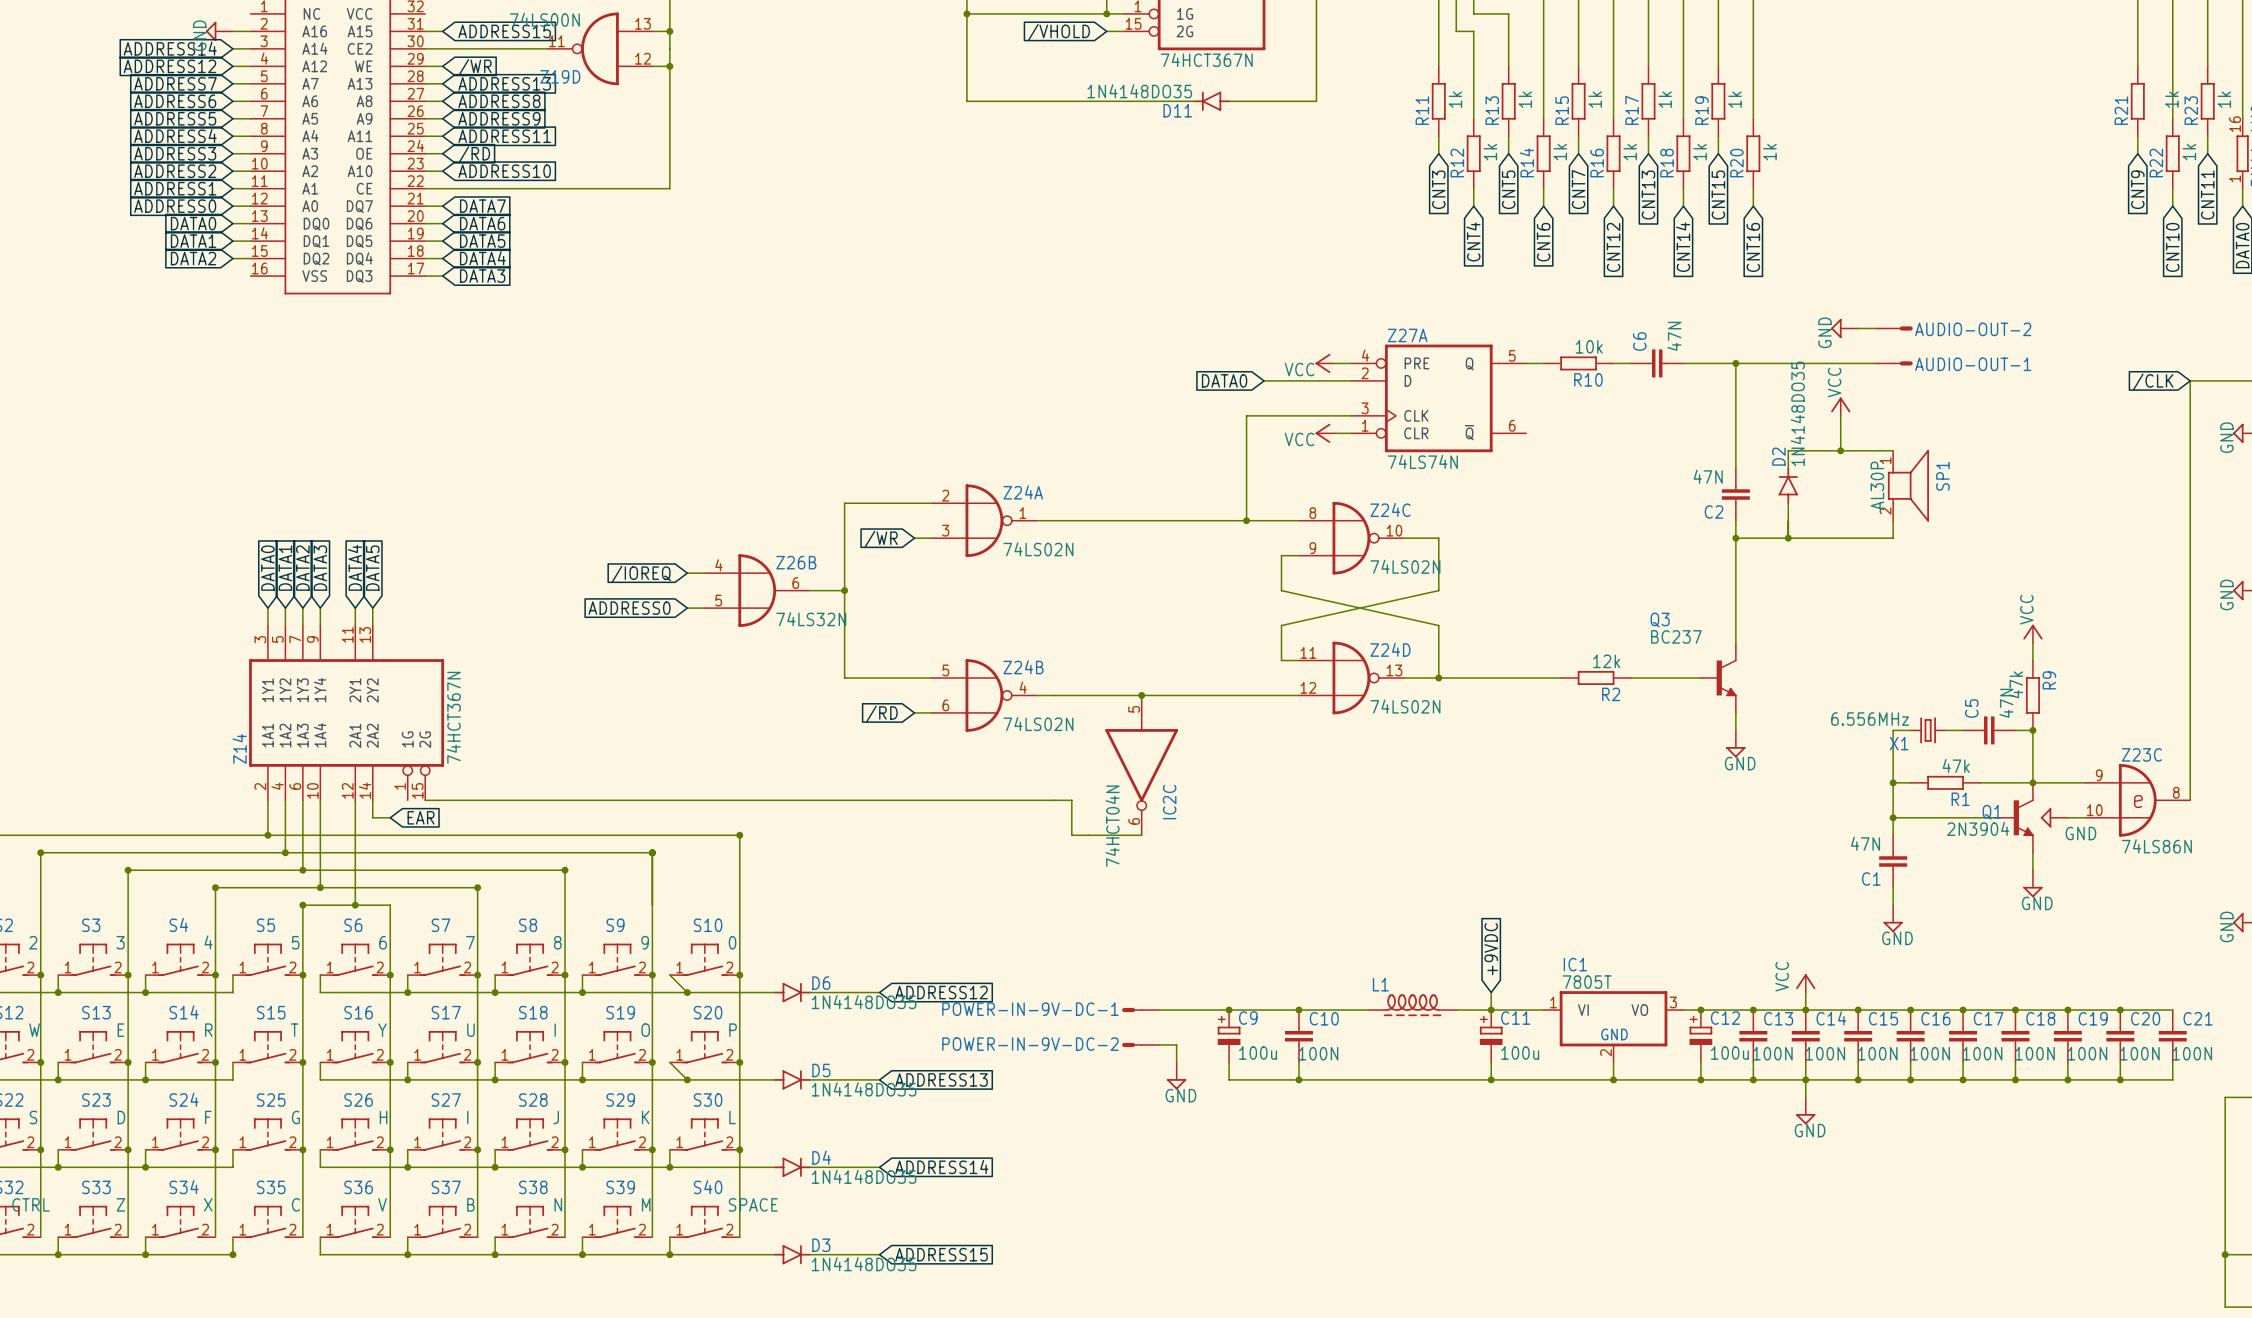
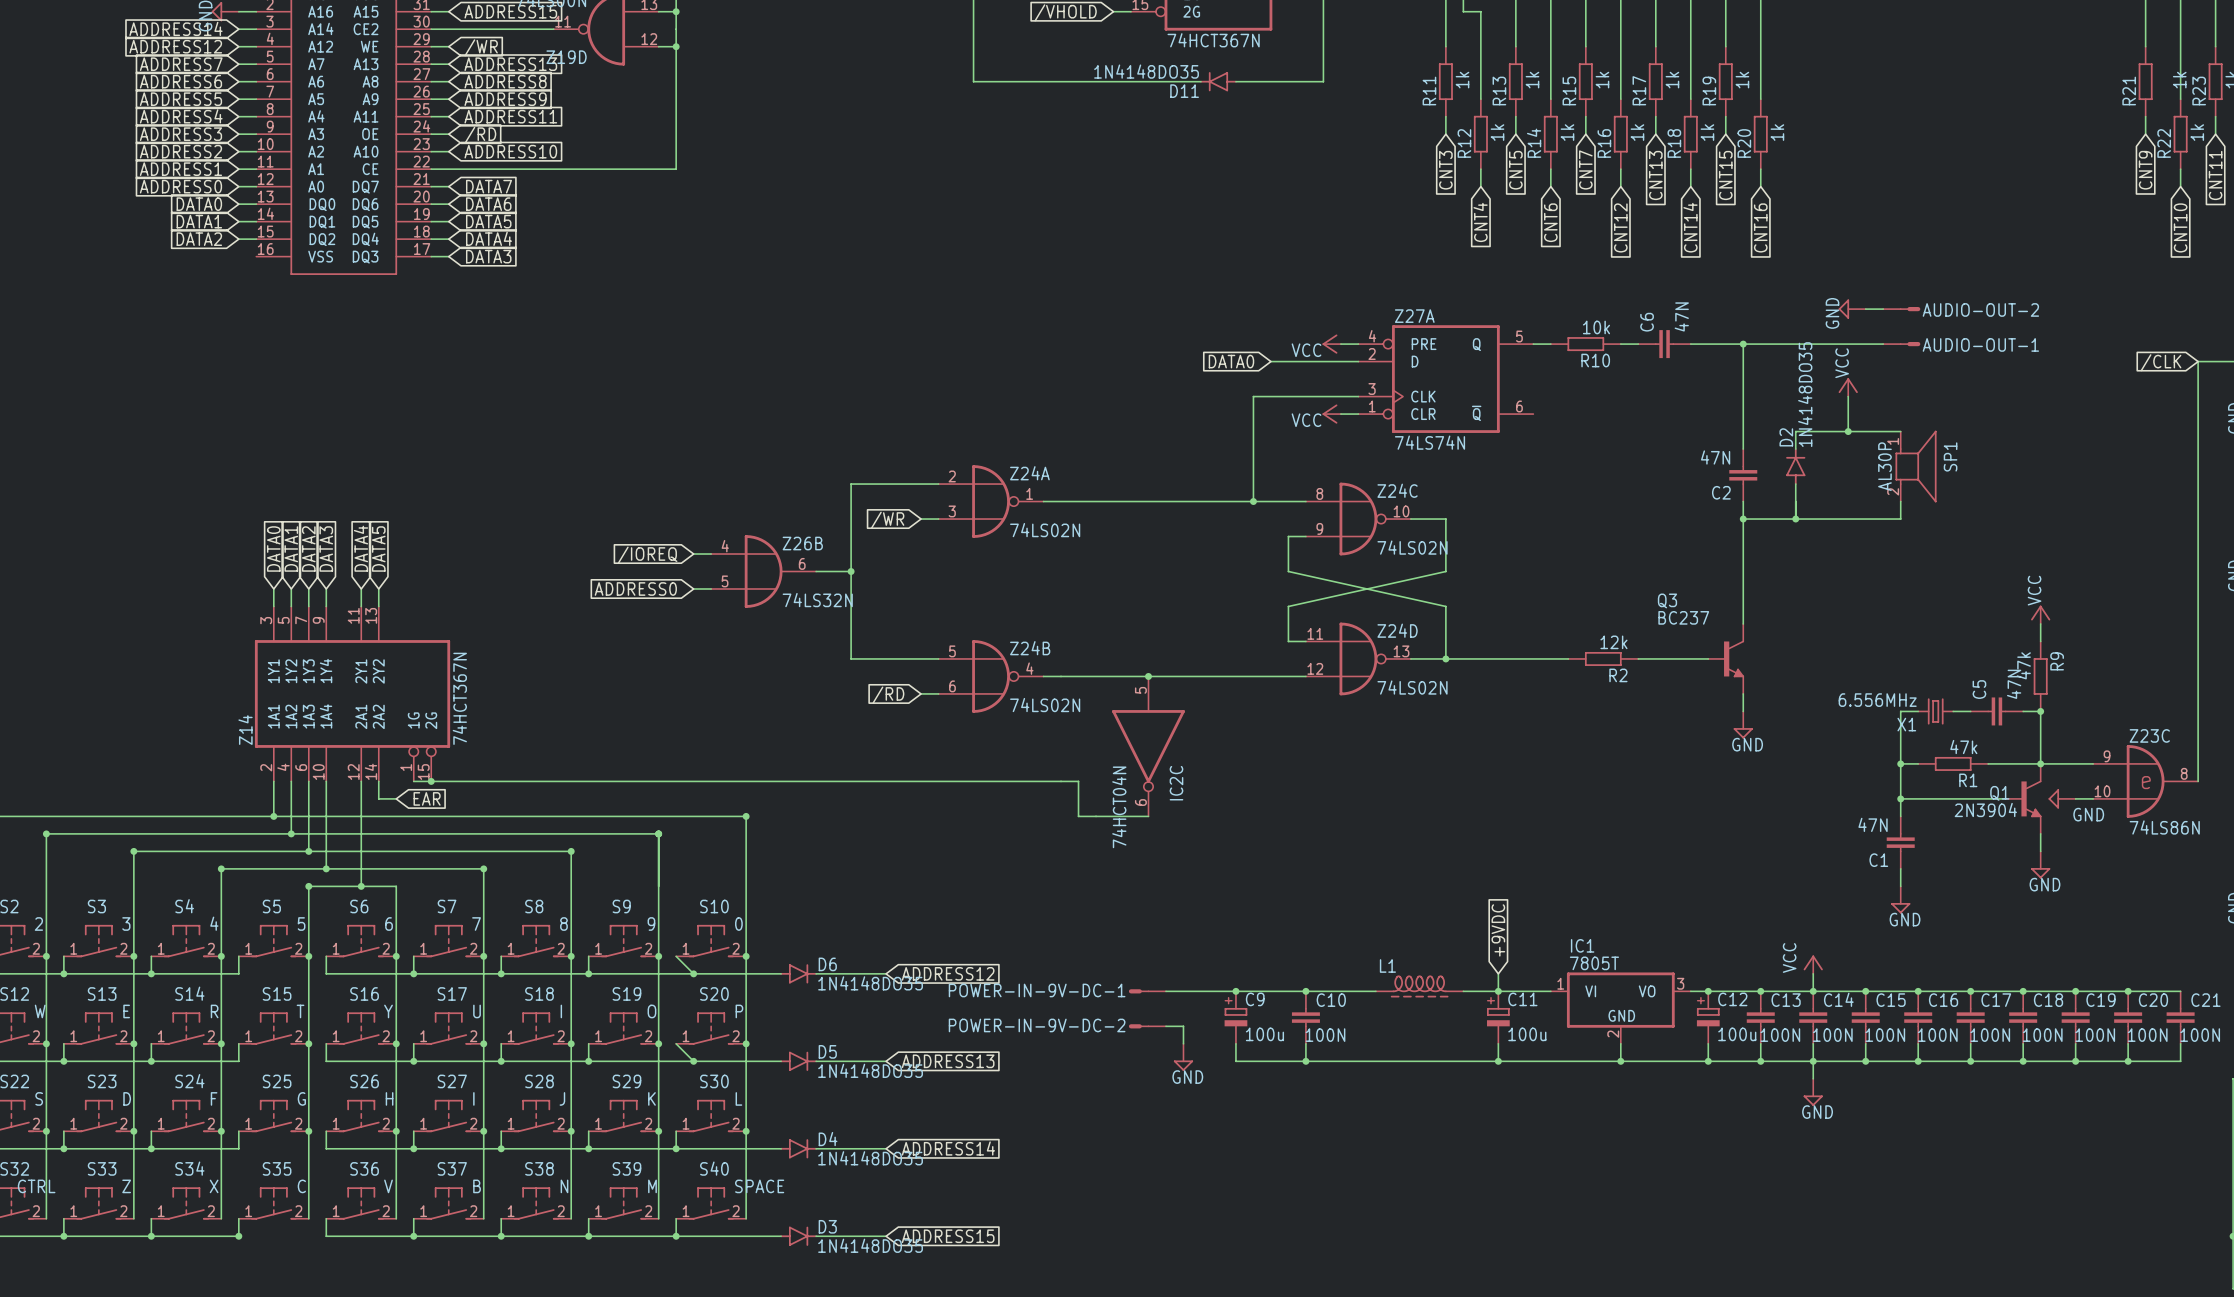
wire: none -> (413, 781) (431, 781)
junction: none -> (431, 781)

